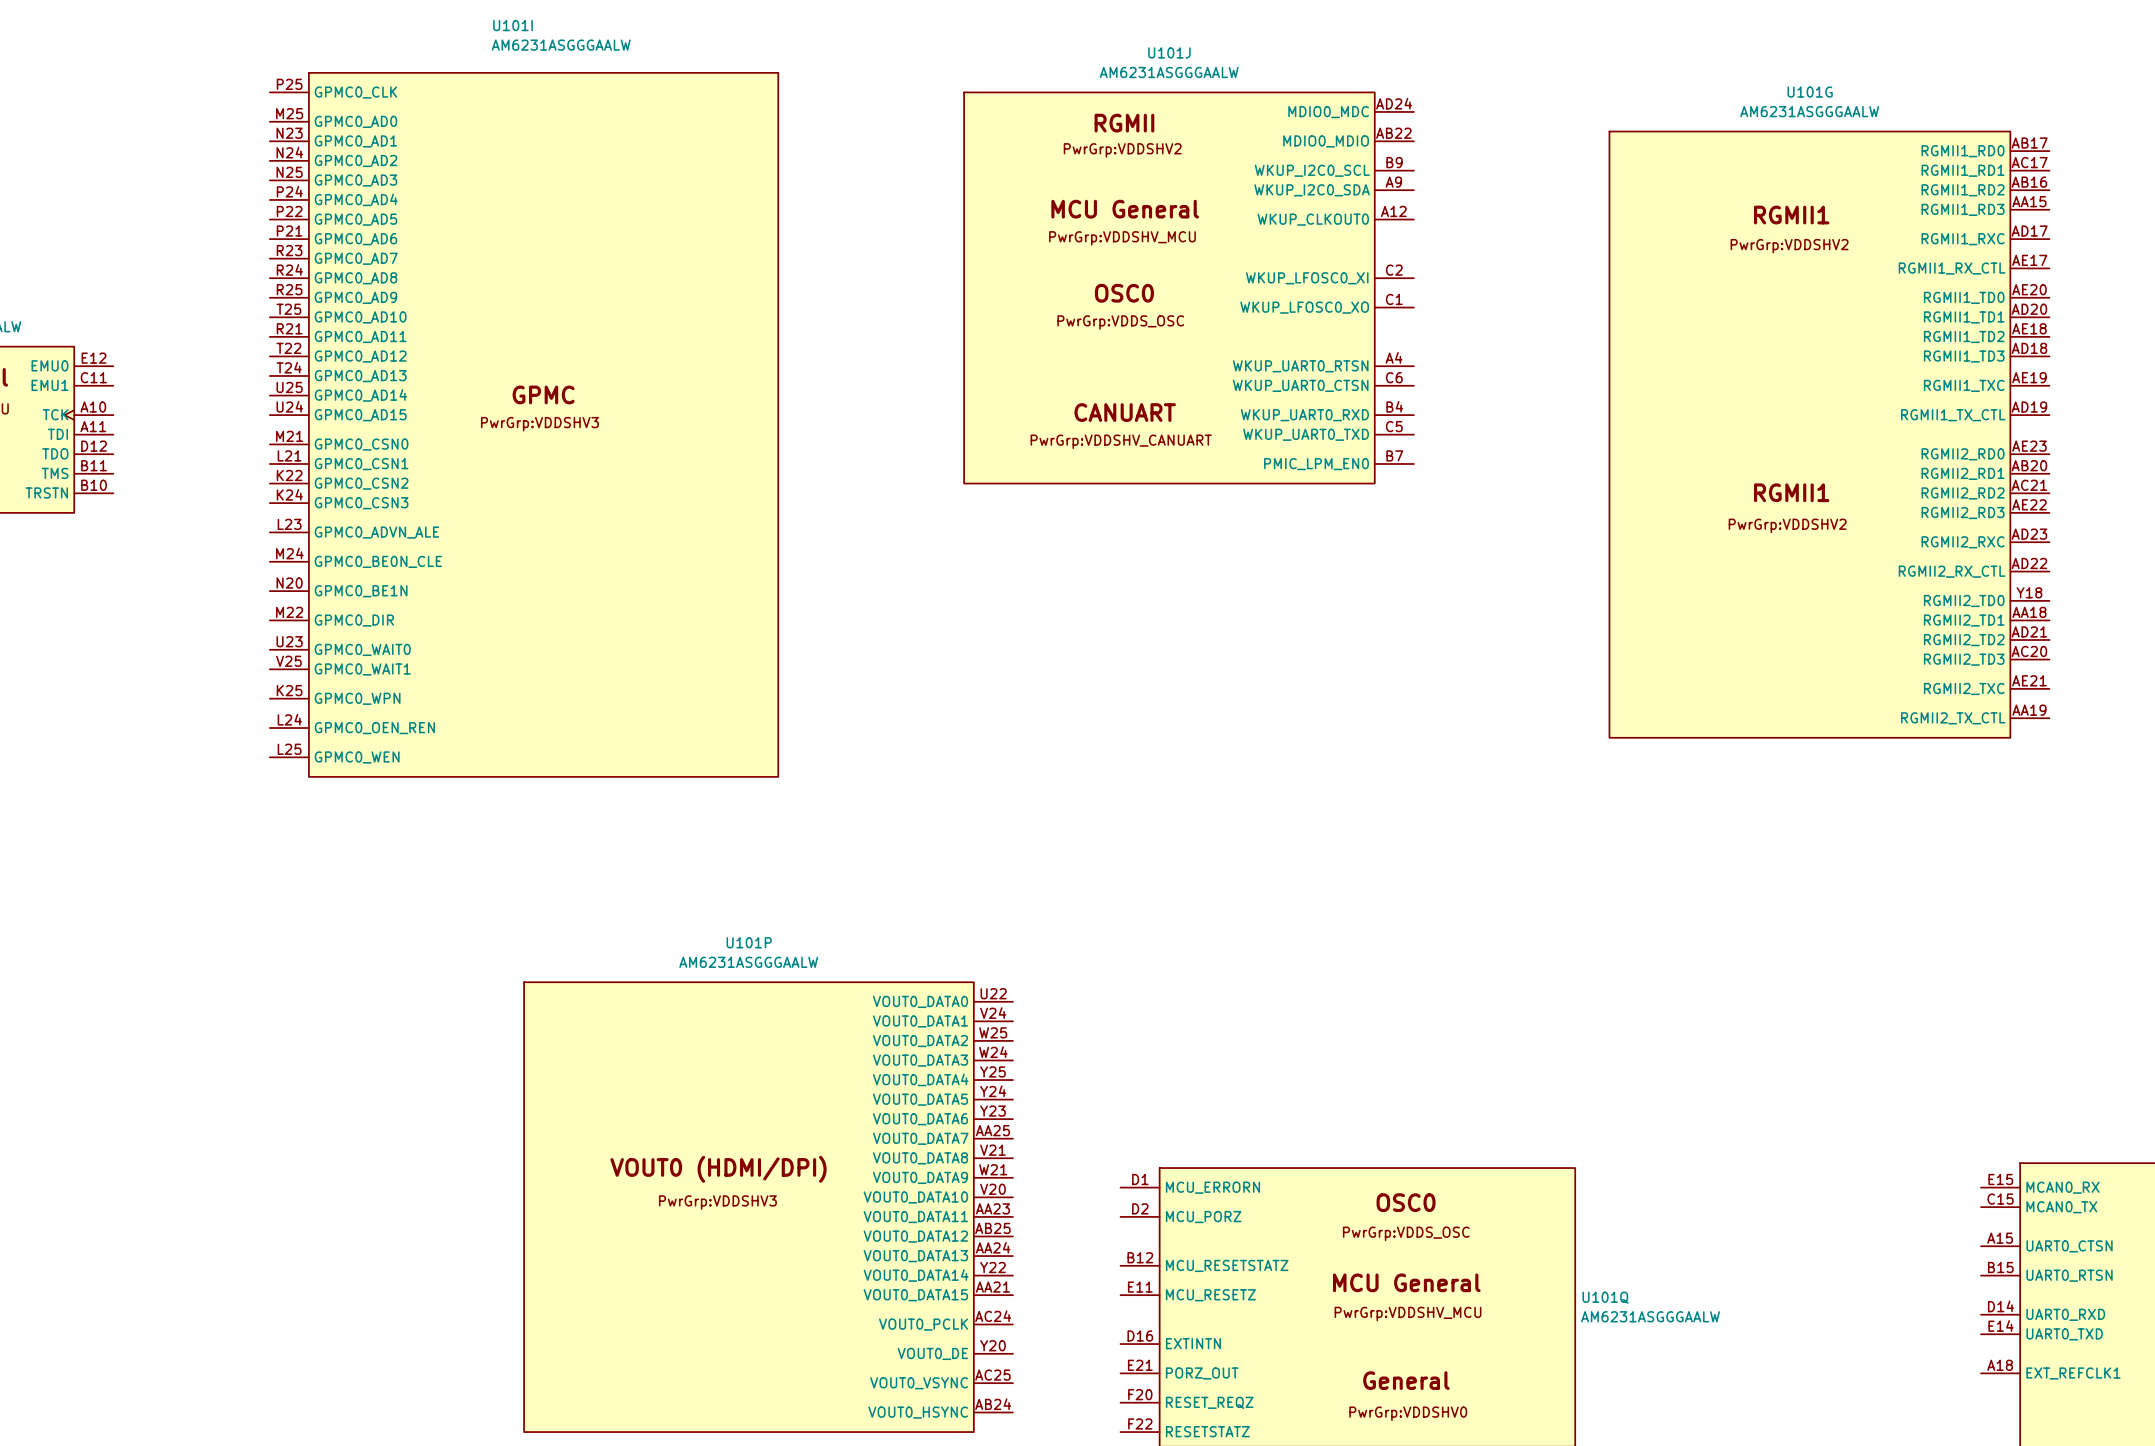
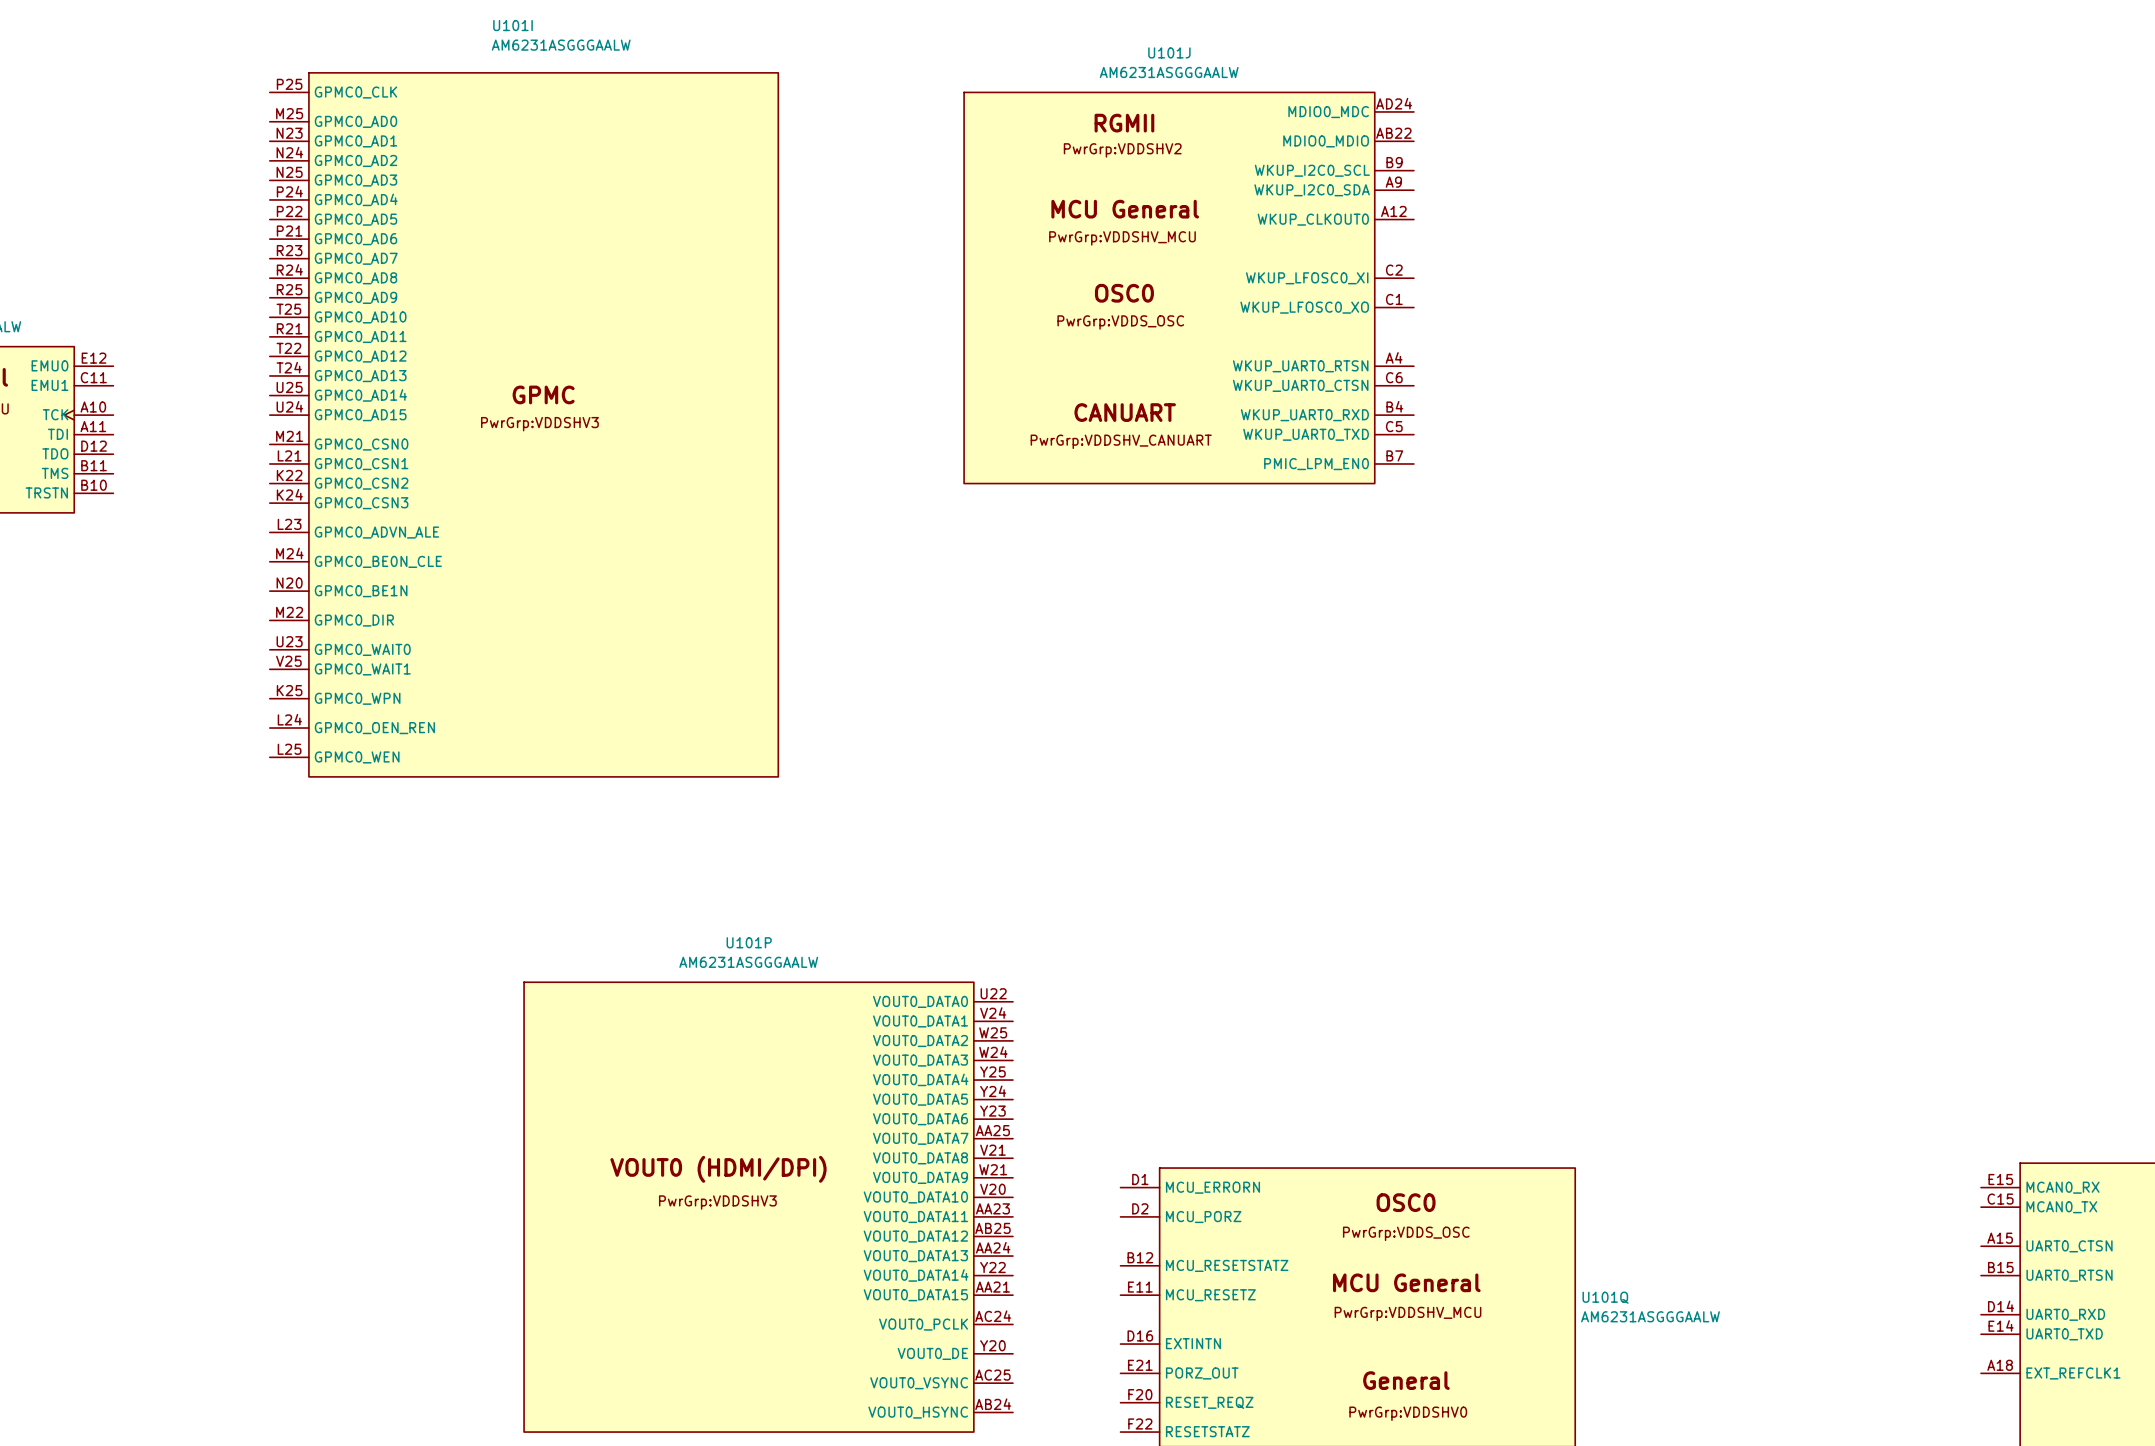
U101G: AM6231ASGGGAALW (1829, 434) -> none

